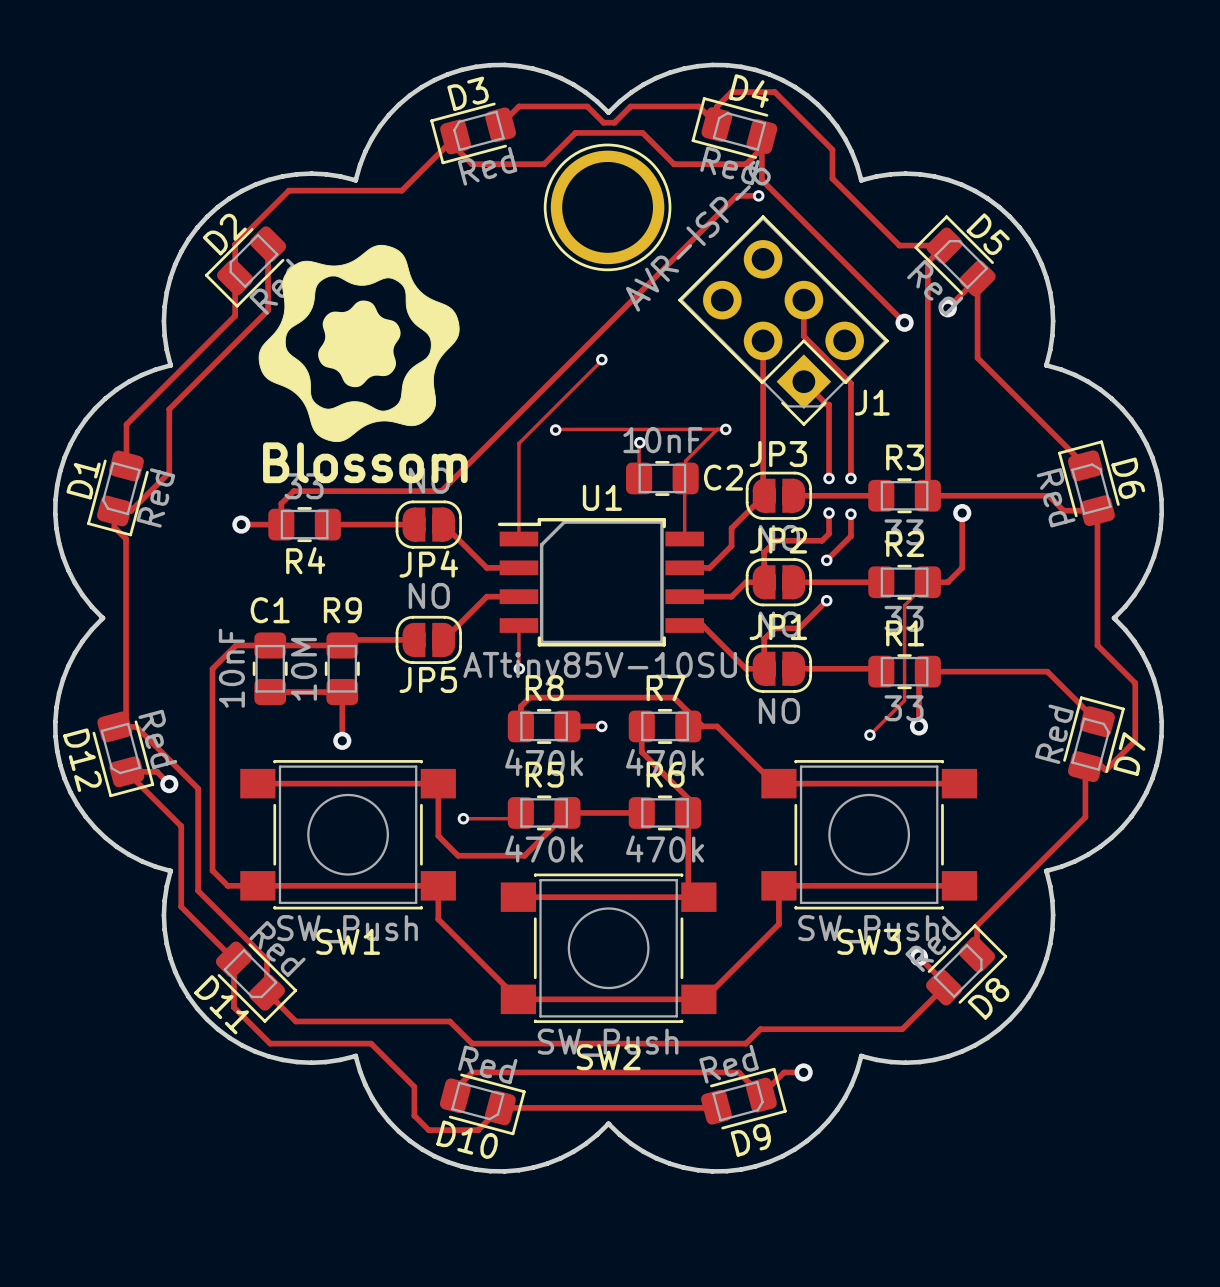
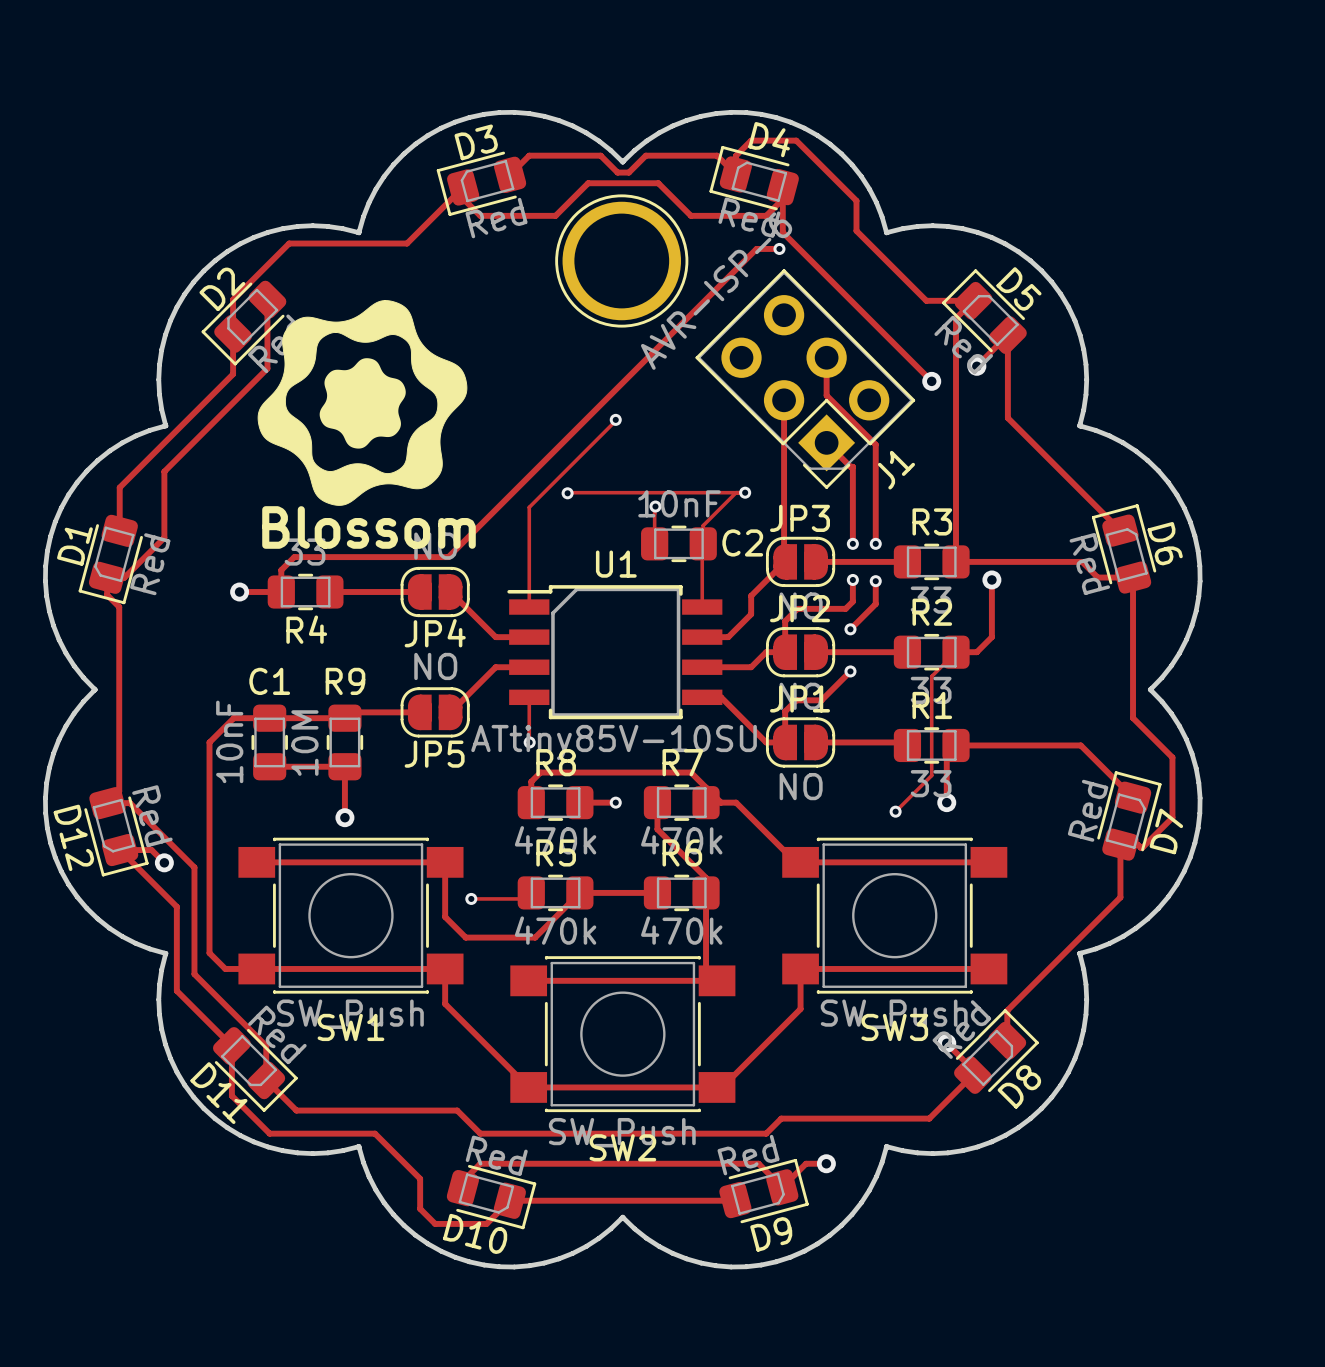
J1 name rotation: 0° (872, 402) -> 45° counterclockwise (896, 470)

